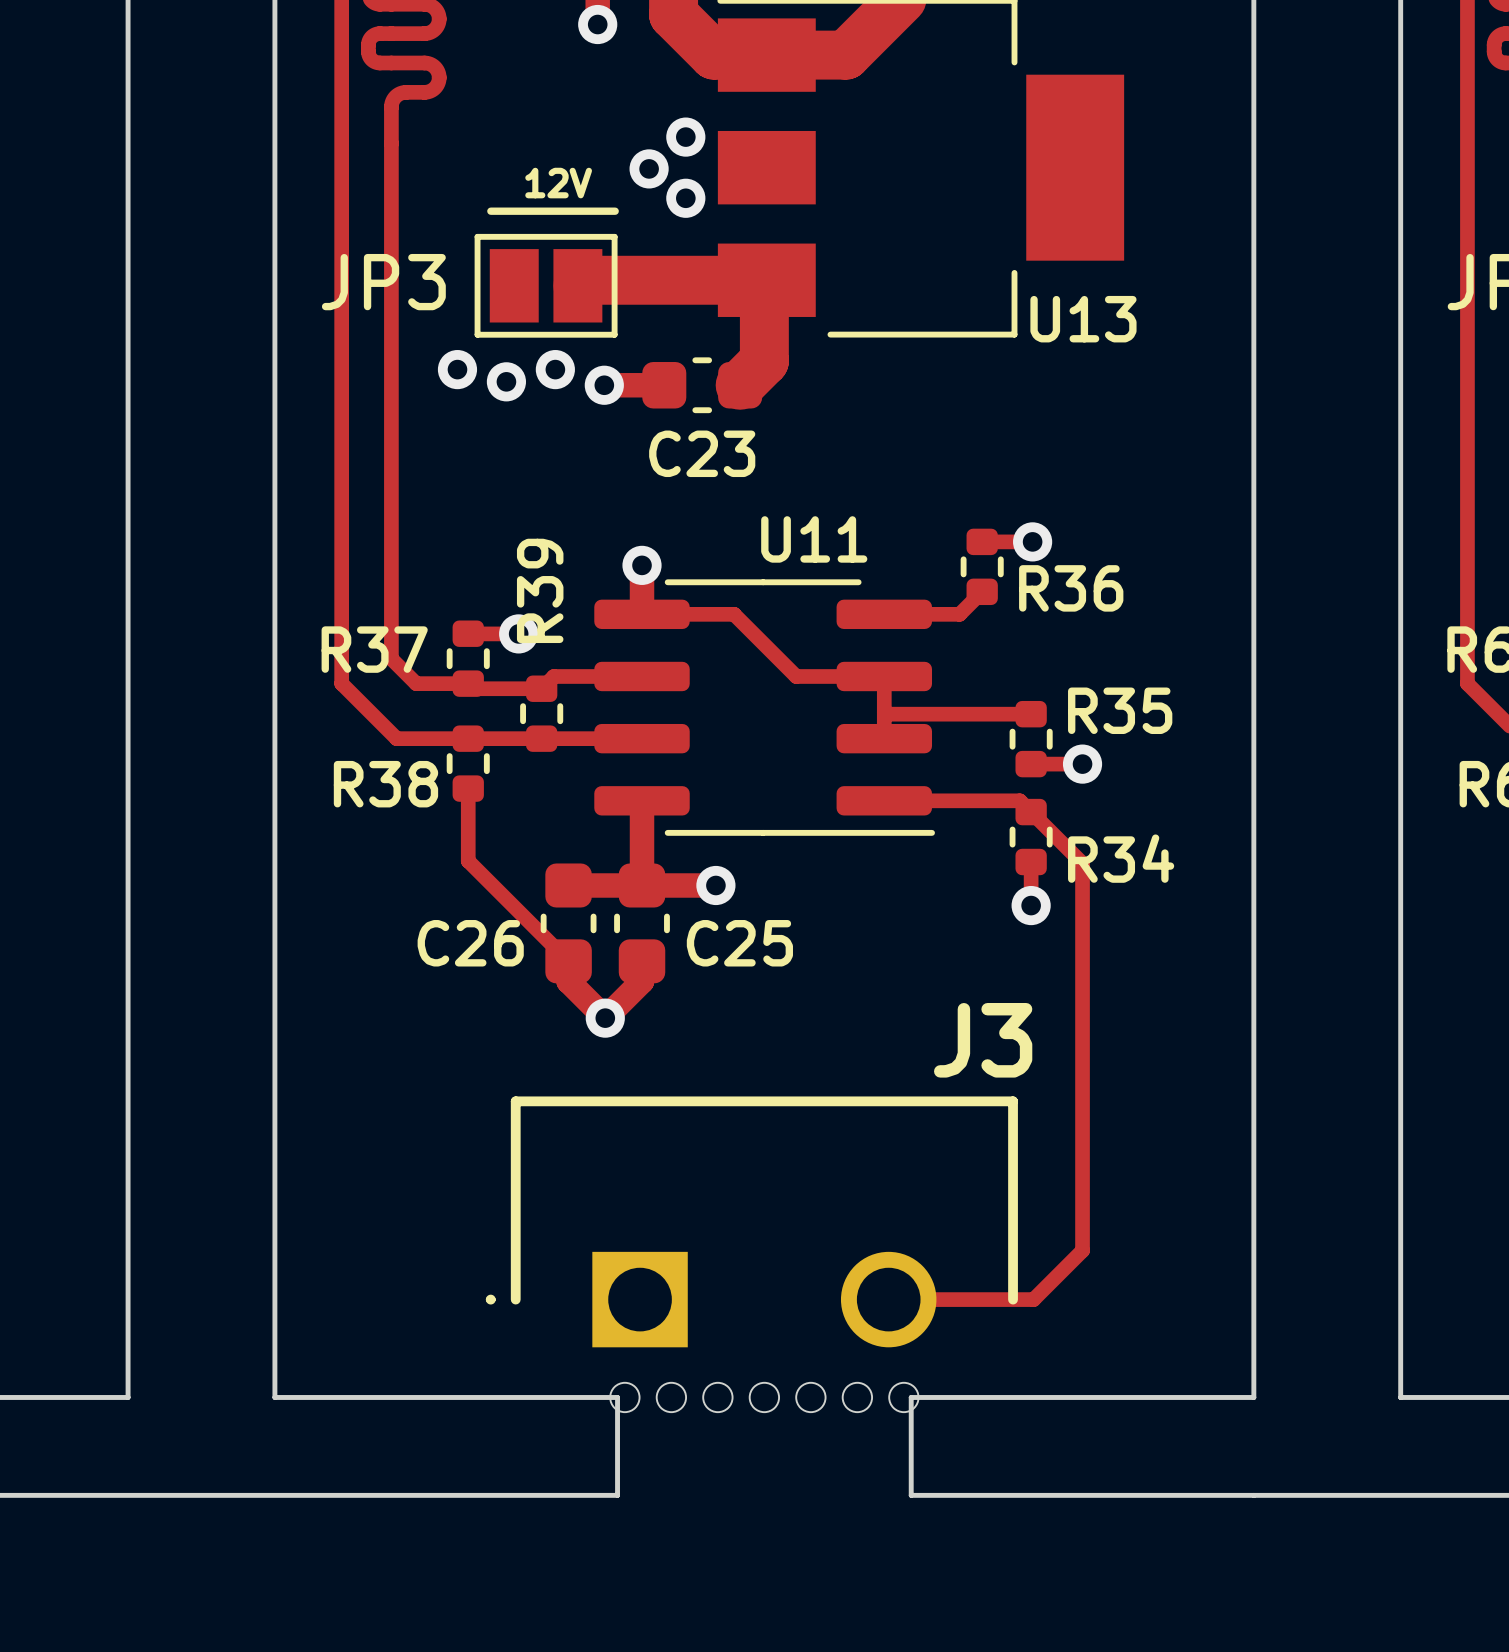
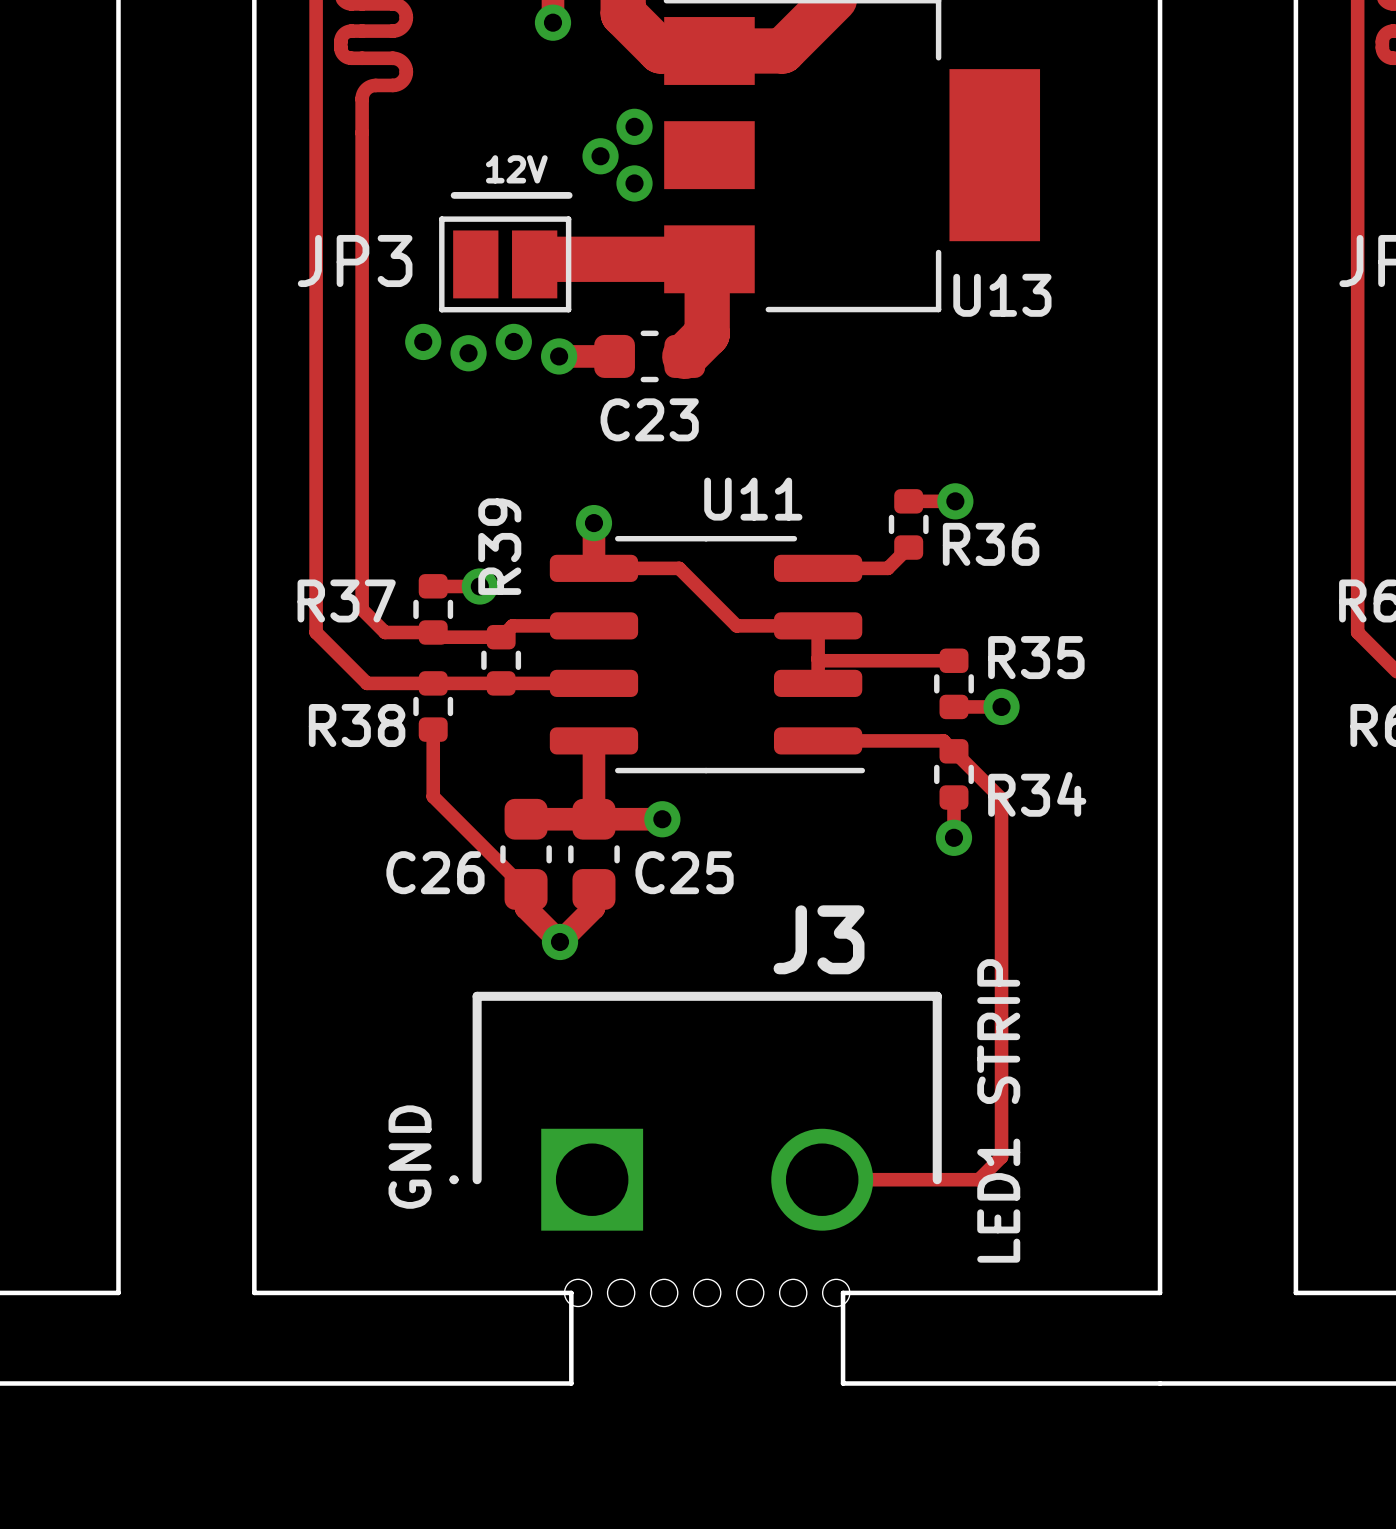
J3 name position: J3 (983, 1040) -> J3 (819, 939)
J3 footprint: [485, 1096, 1018, 1348] -> [449, 991, 942, 1231]
text: none -> LED1 STRIP (998, 1110)
text: none -> GND (410, 1157)
track: (1058, 1275) (1033, 1299) (888, 1299) -> (978, 1179) (844, 1179)

